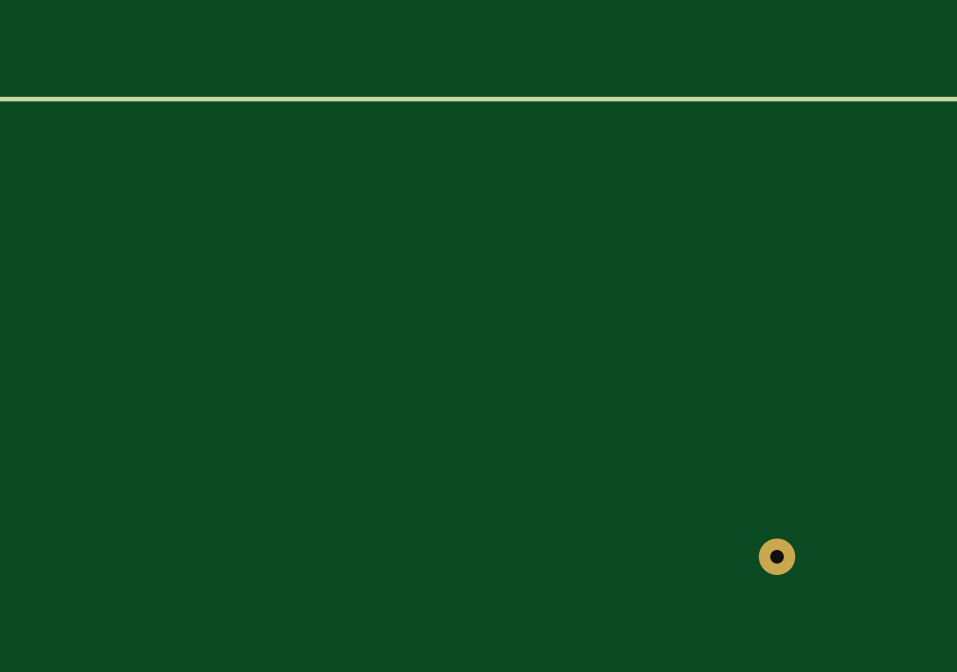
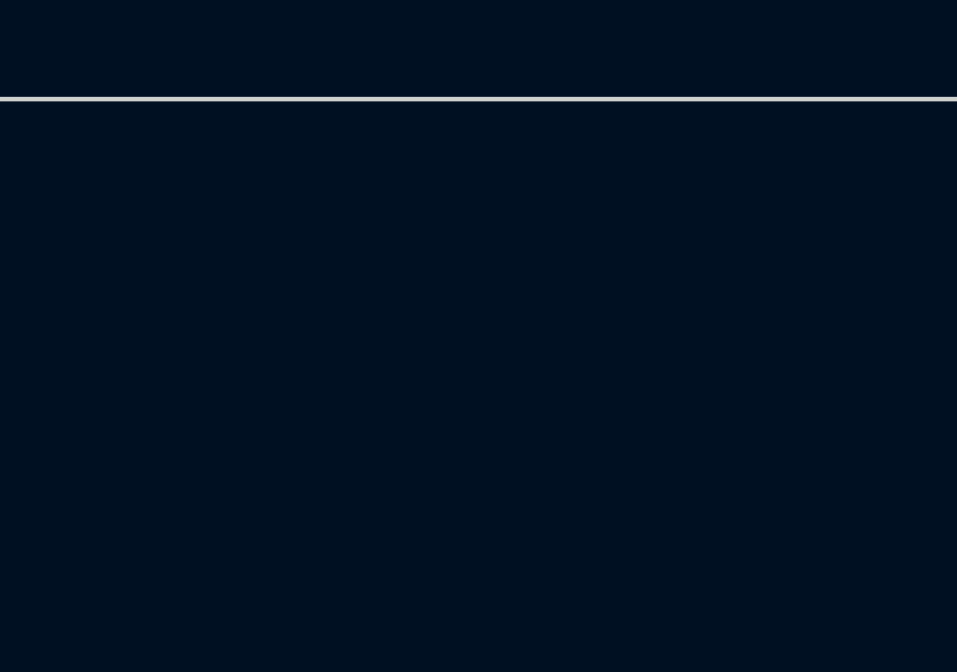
via: (777, 556) -> none

